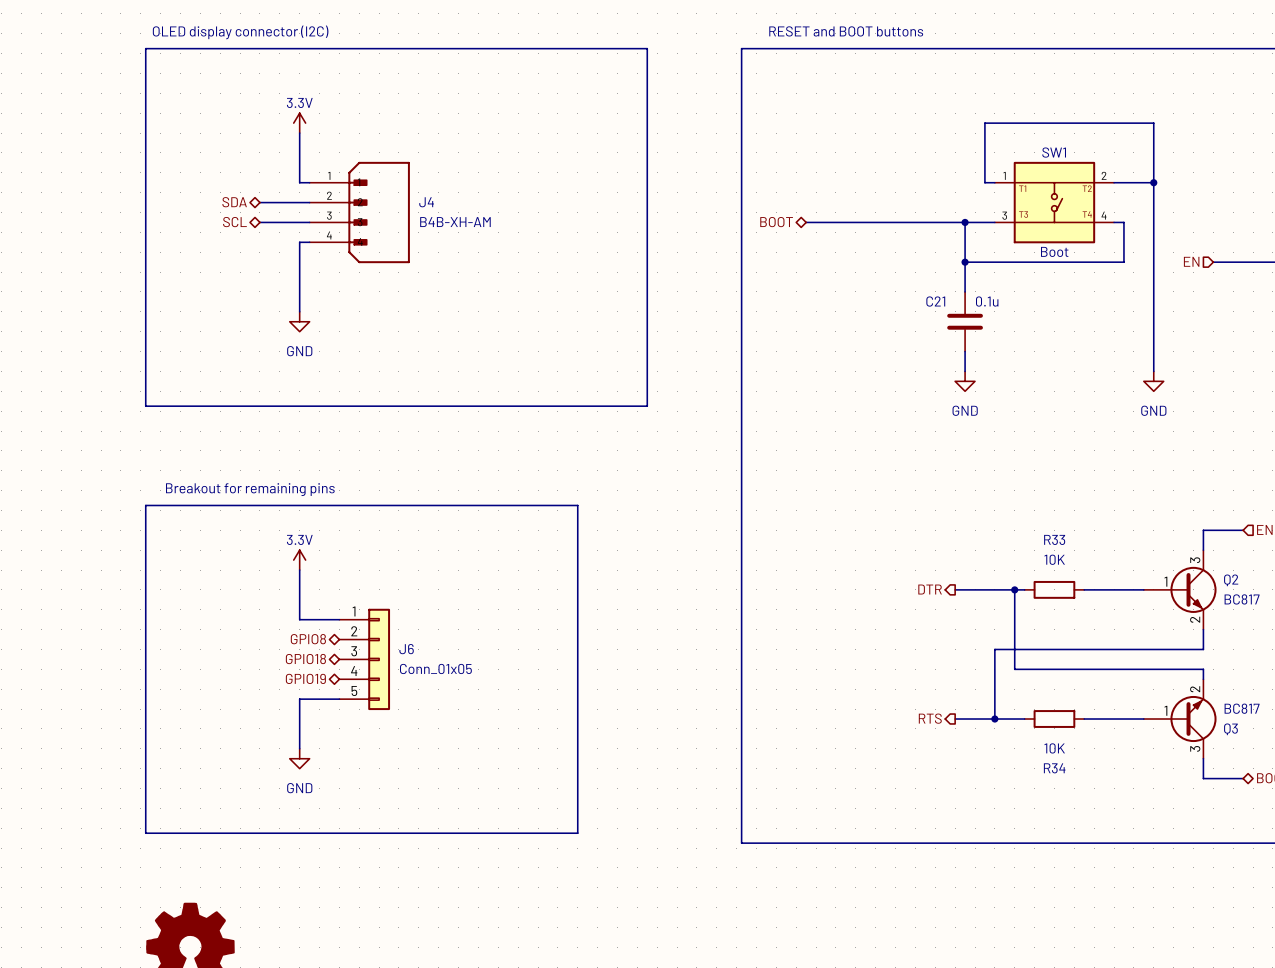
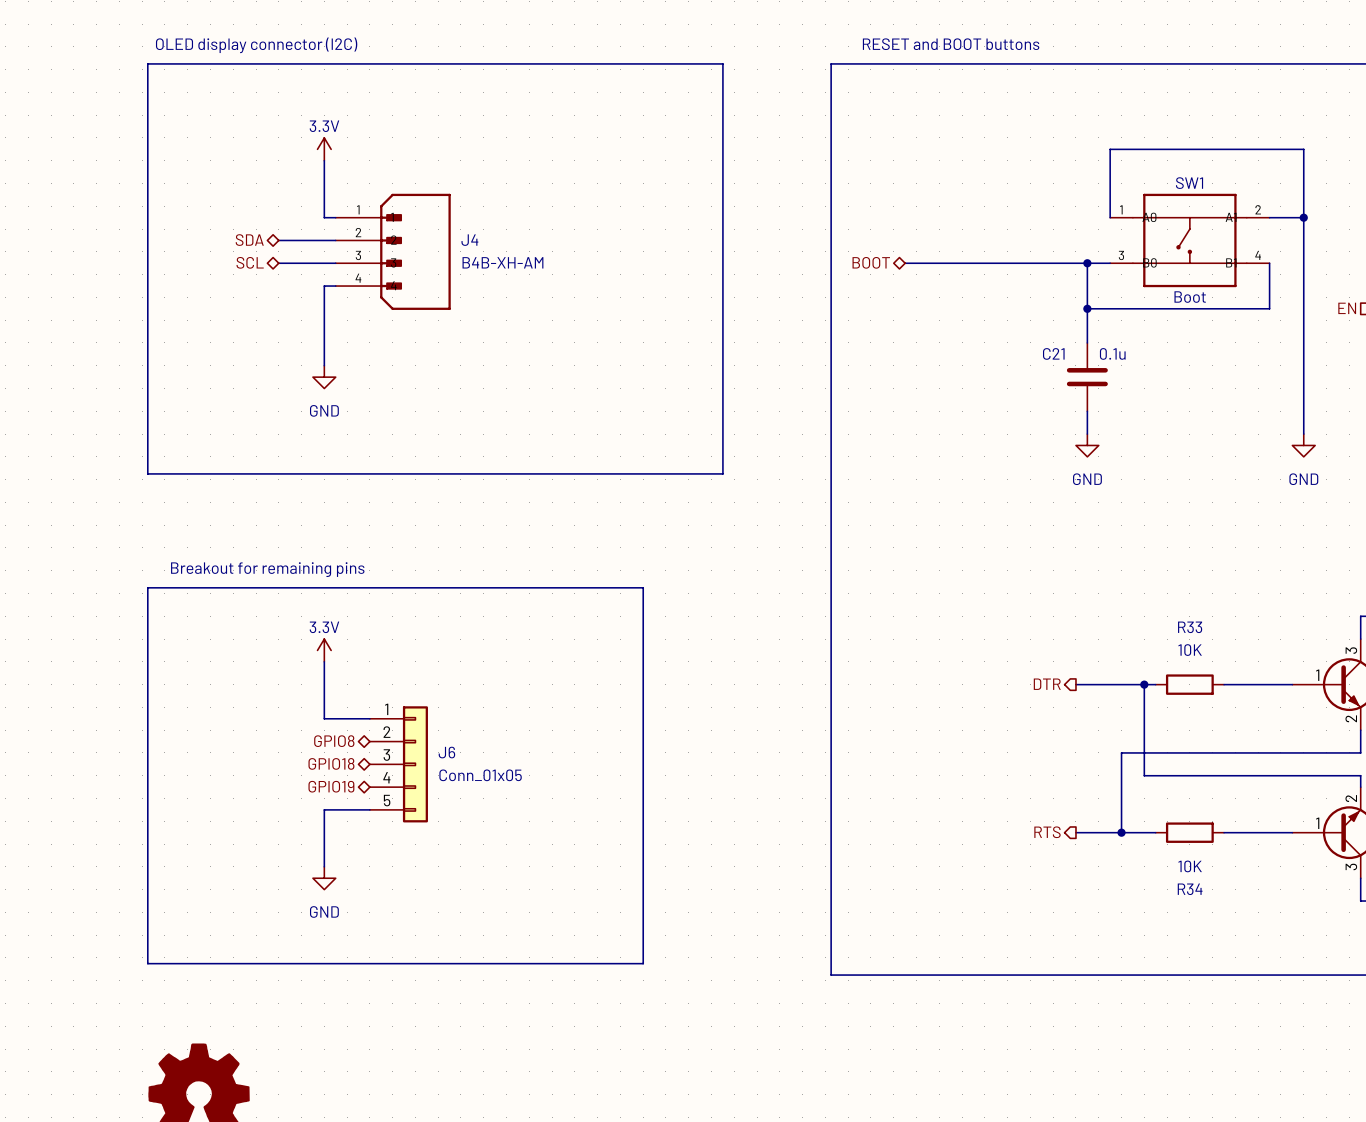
SW1 symbol: [994, 161, 1115, 244] -> [1110, 193, 1270, 288]

